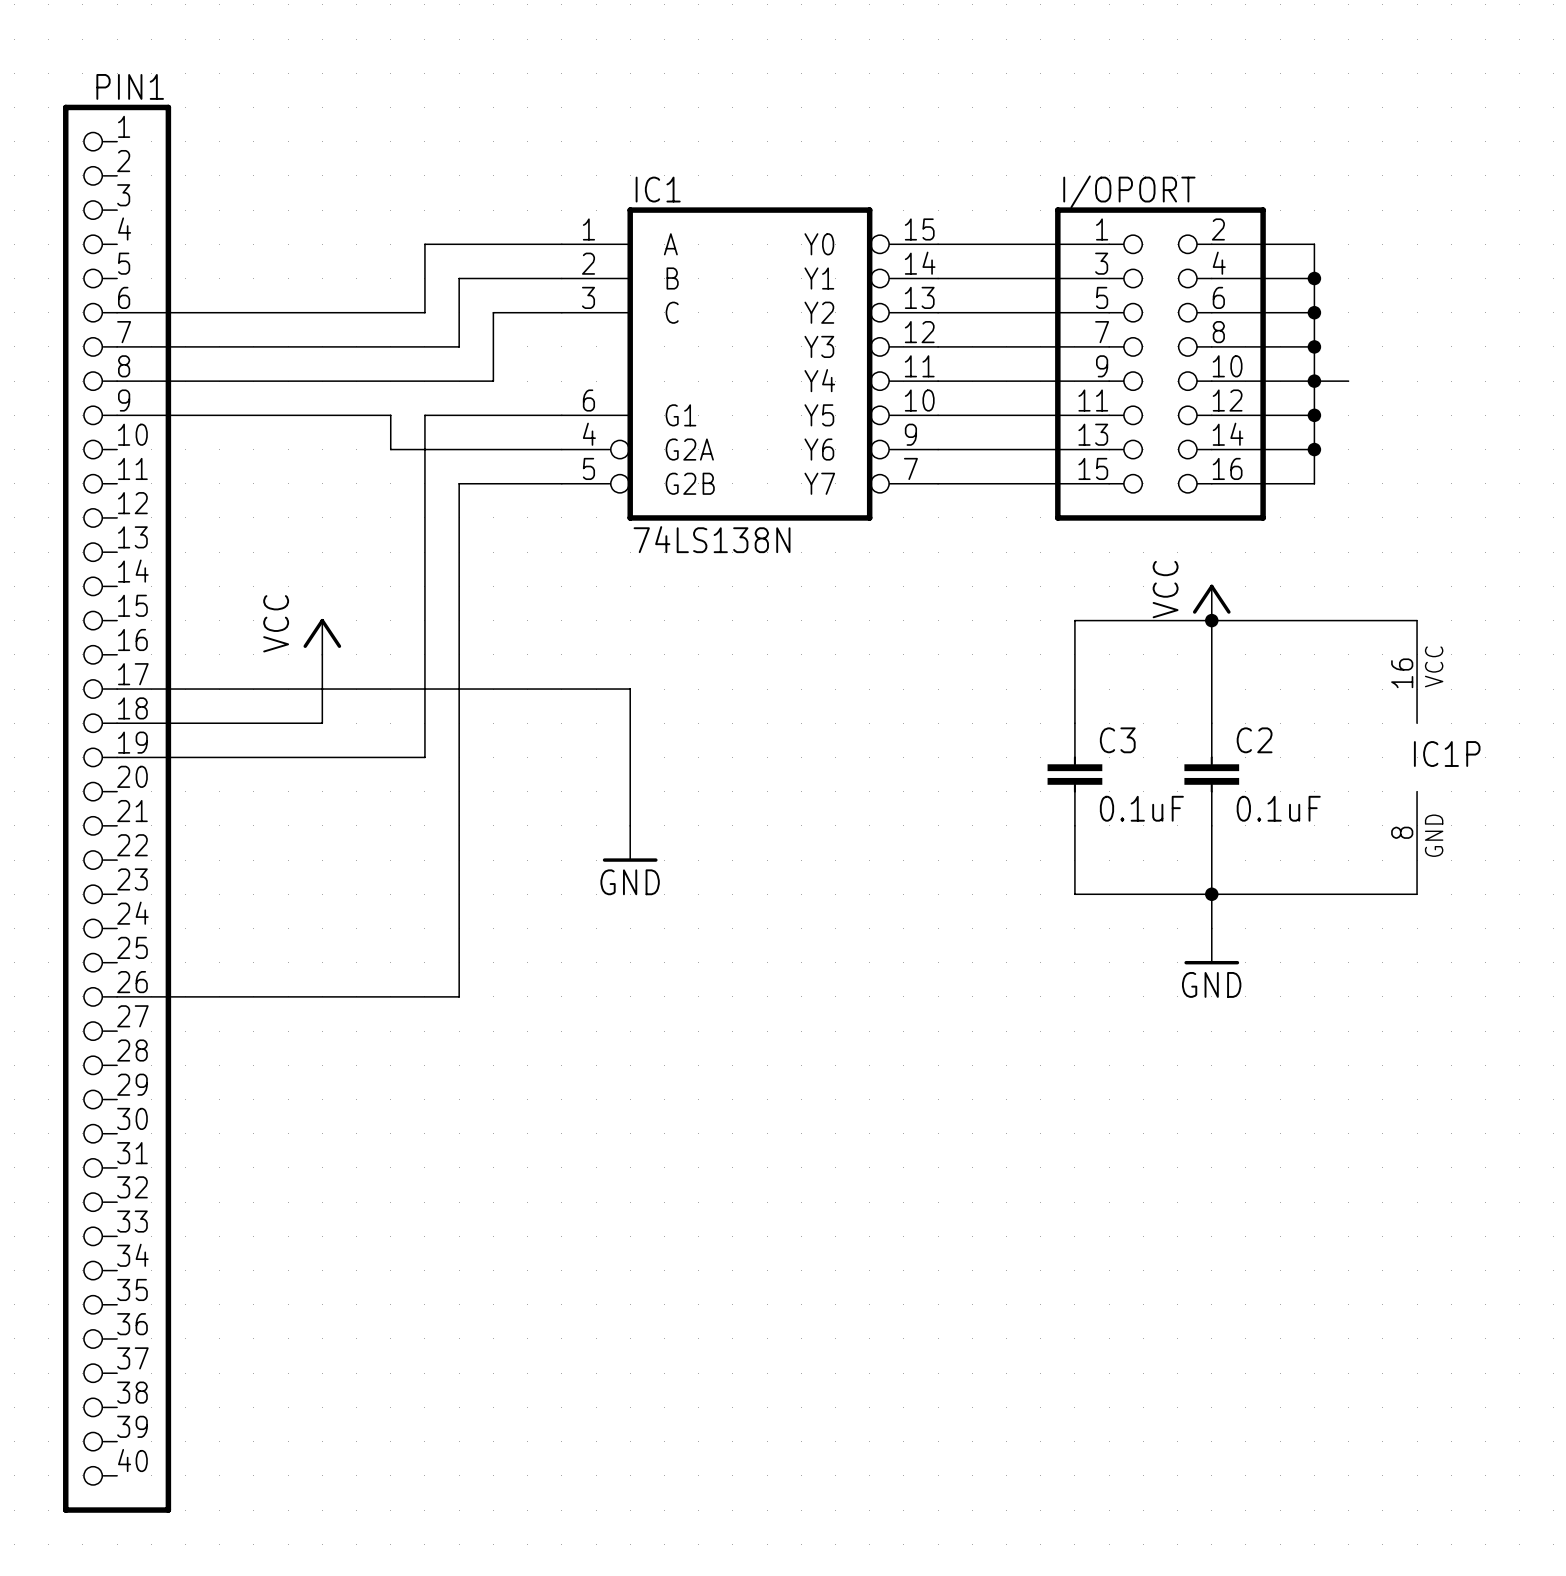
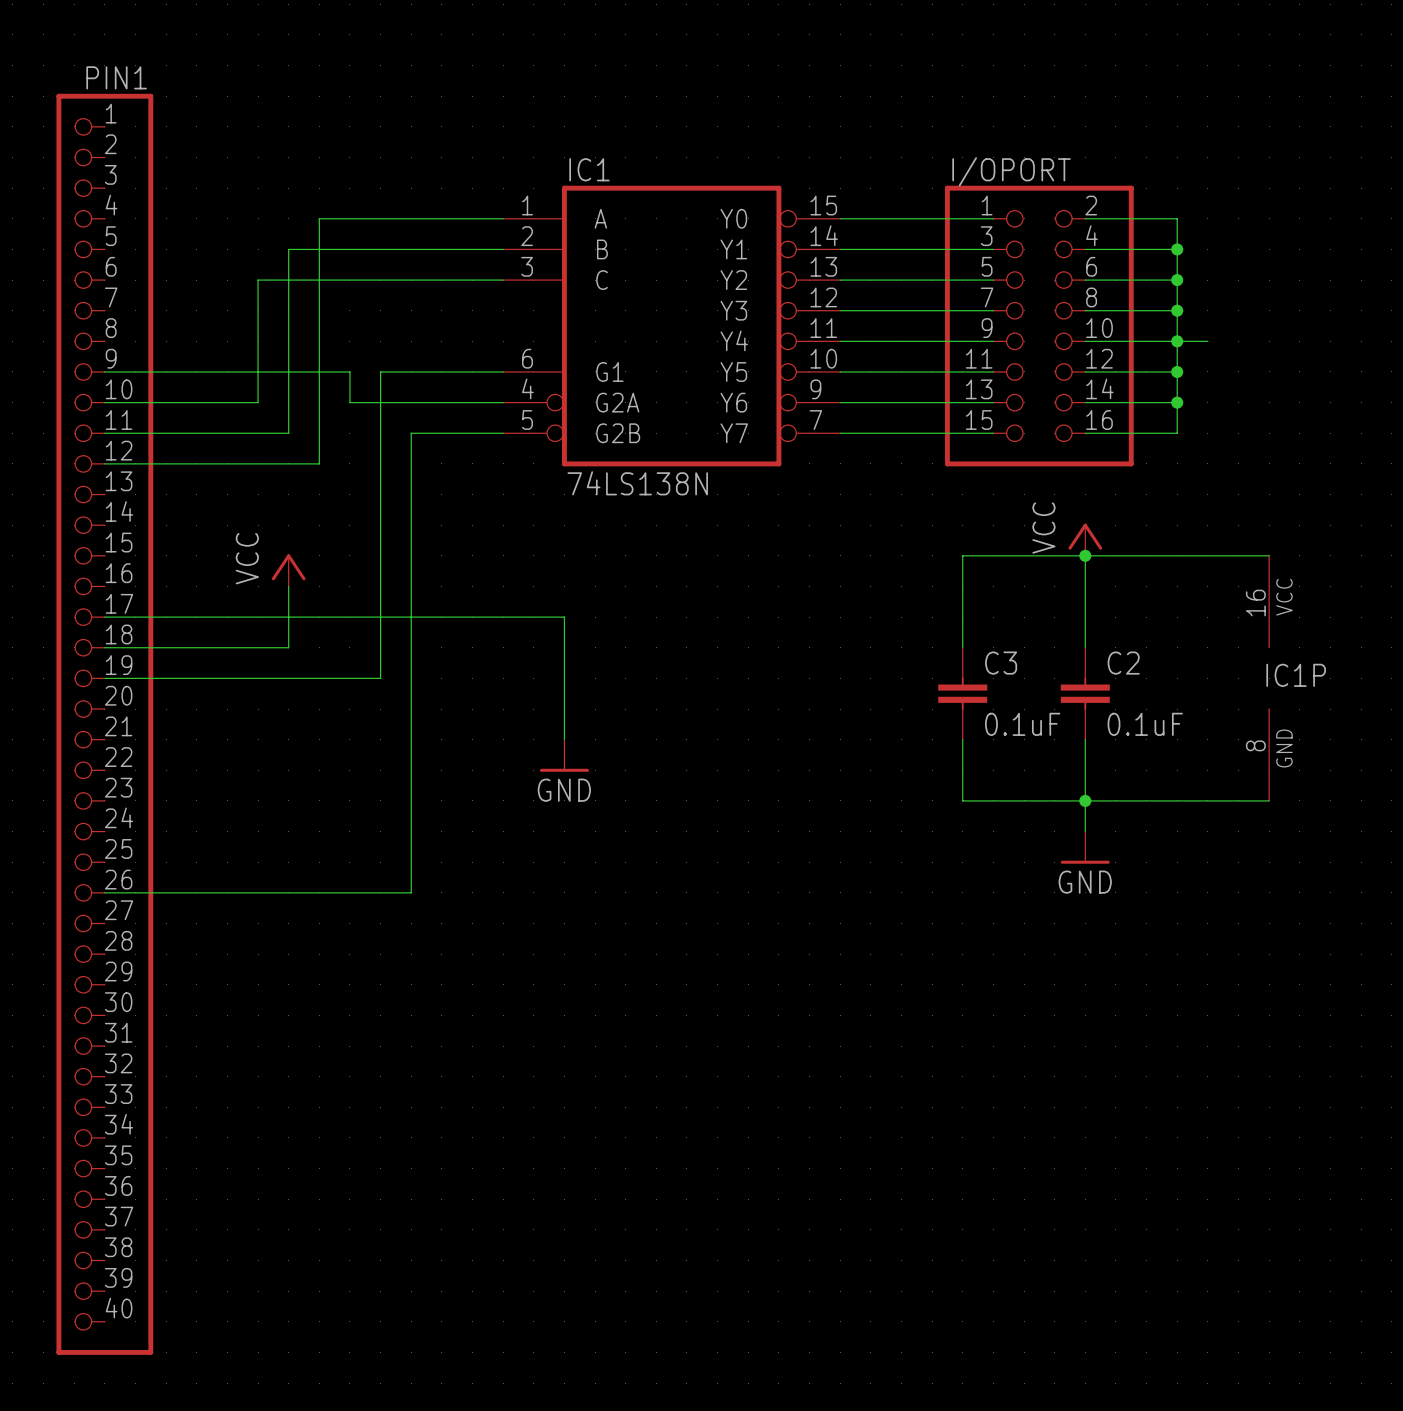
wire: (424, 244) (424, 312) -> (441, 280) (380, 280)
wire: none -> (380, 218) (319, 218) (319, 463) (104, 463)
wire: (459, 278) (459, 346) (117, 346) -> (411, 249) (288, 249) (288, 433) (104, 433)
wire: (117, 312) (288, 312) -> (104, 402) (258, 402) (258, 280)
wire: (493, 312) (493, 381) (117, 381) -> none

